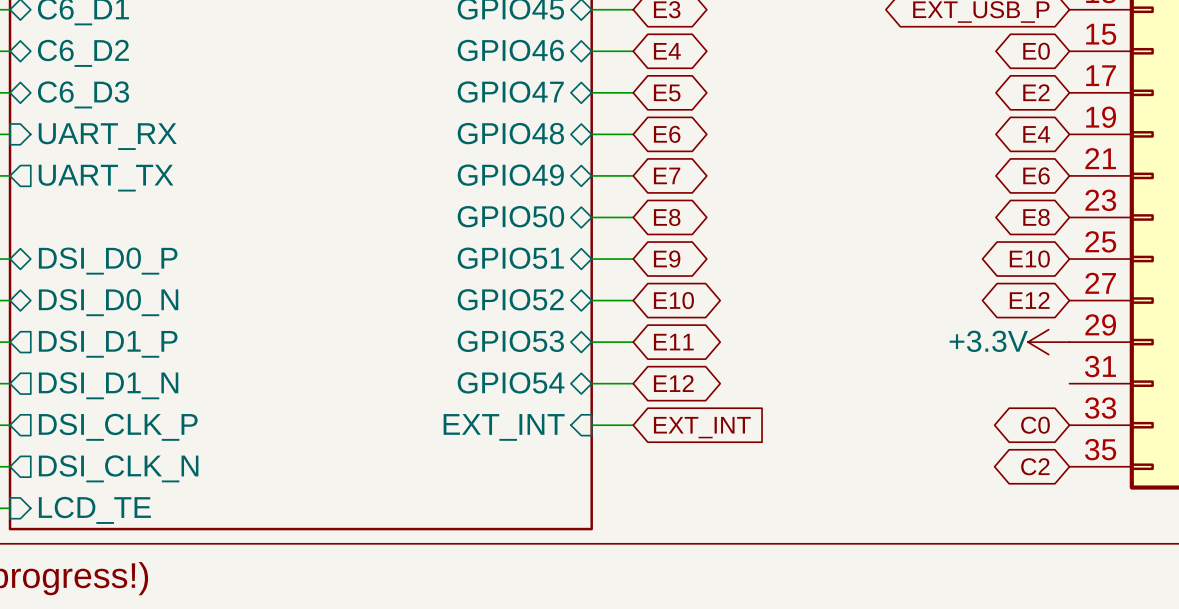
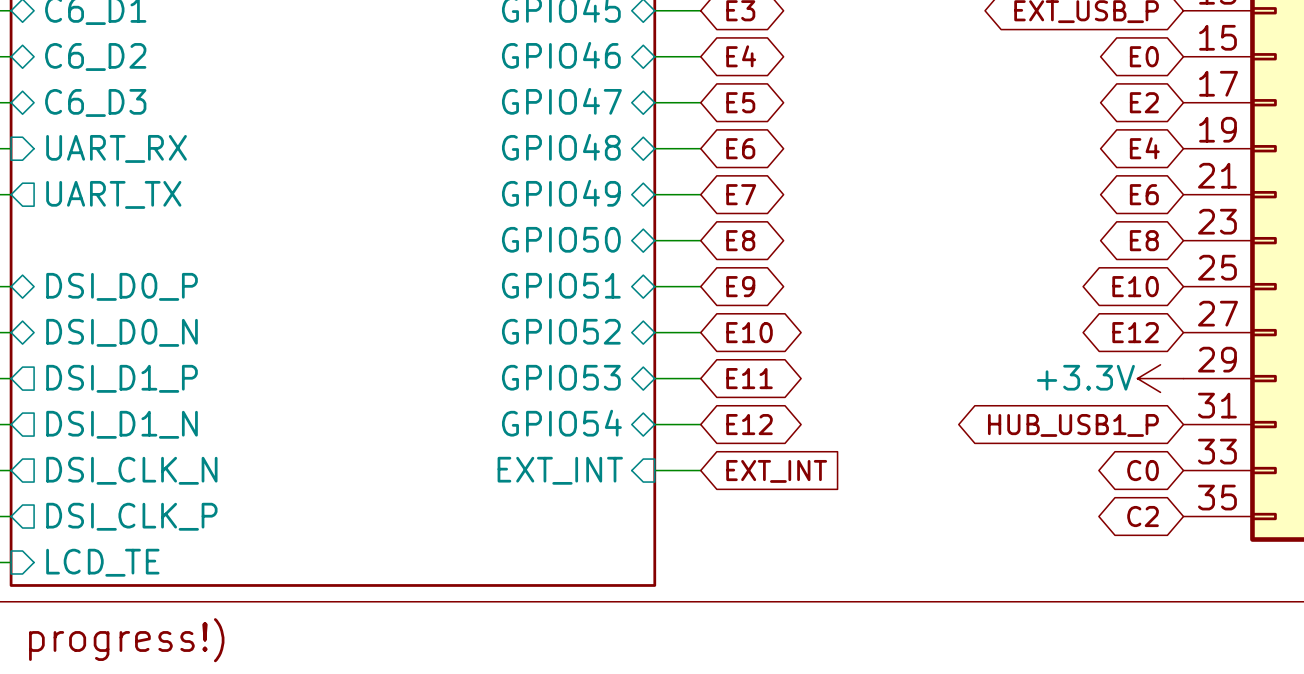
global label: none -> HUB_USB1_P (1073, 425)
sheet pin: DSI_CLK_P (118, 427) -> DSI_CLK_N (131, 470)
sheet pin: DSI_CLK_N (118, 468) -> DSI_CLK_P (131, 516)

